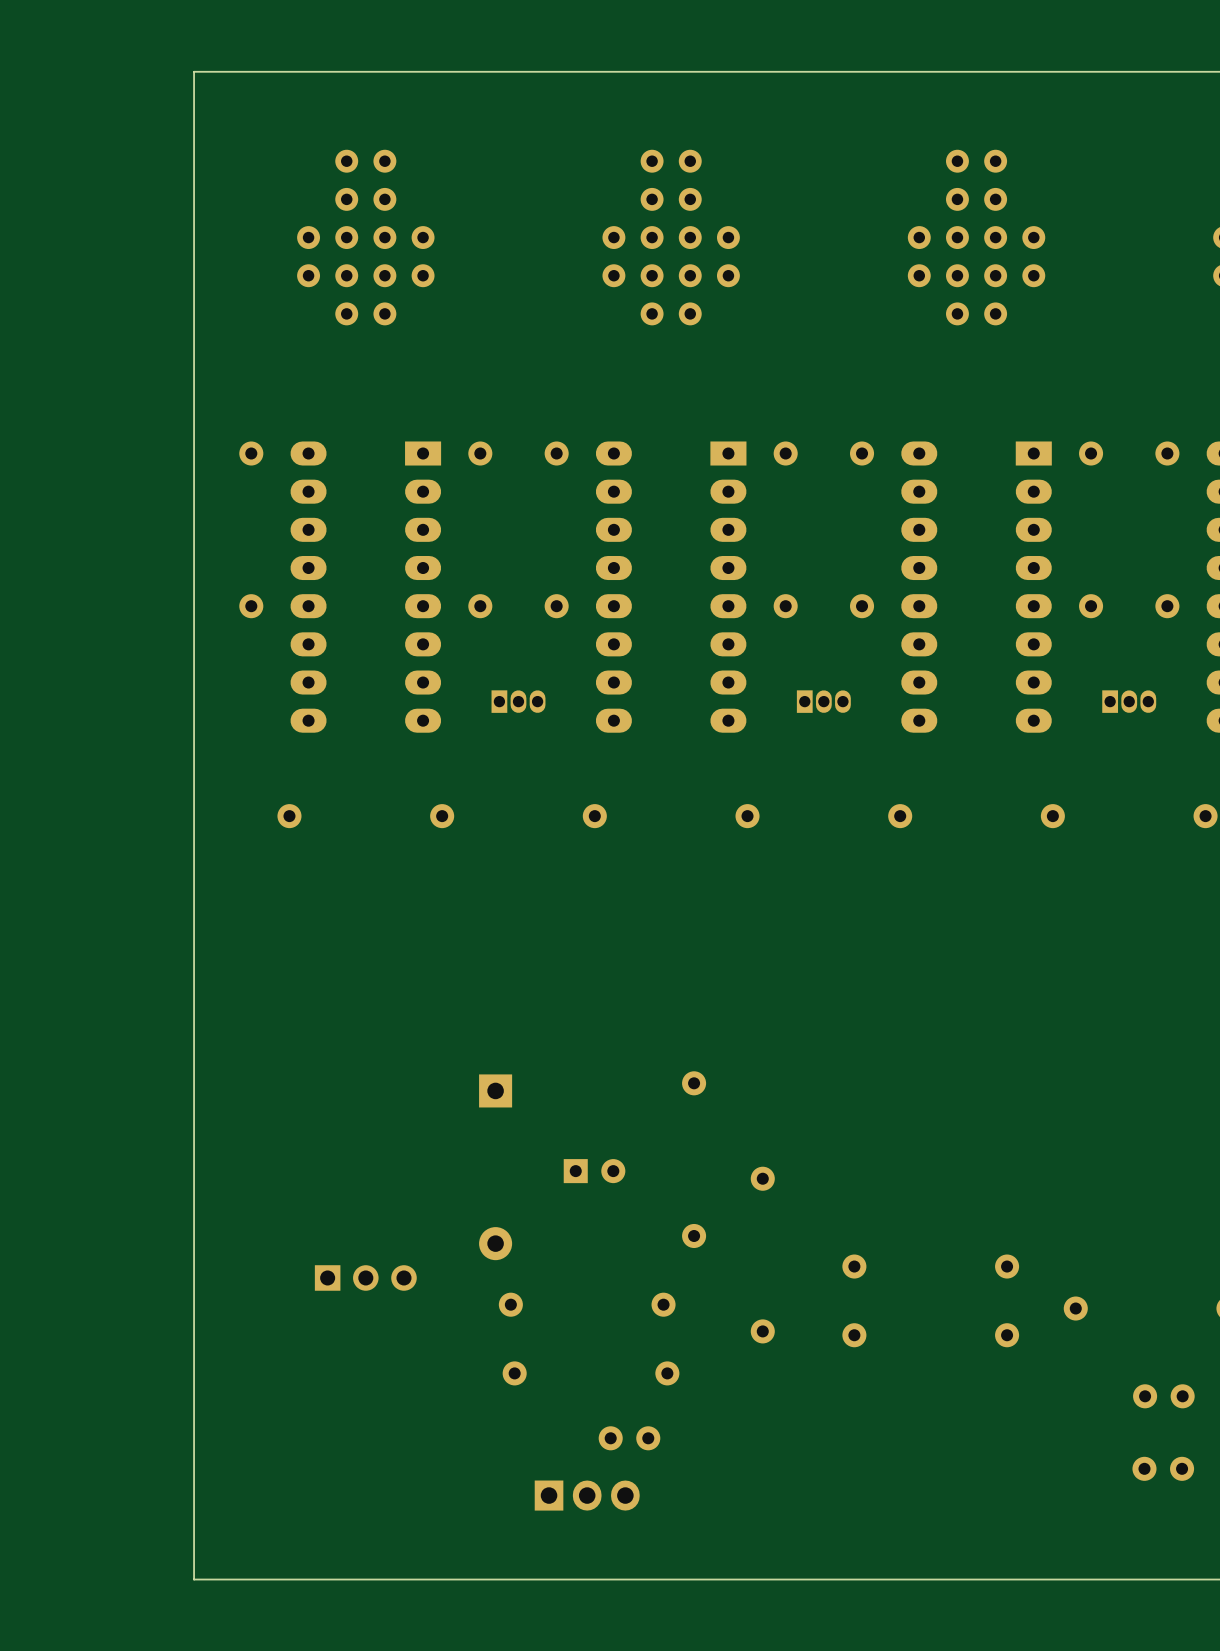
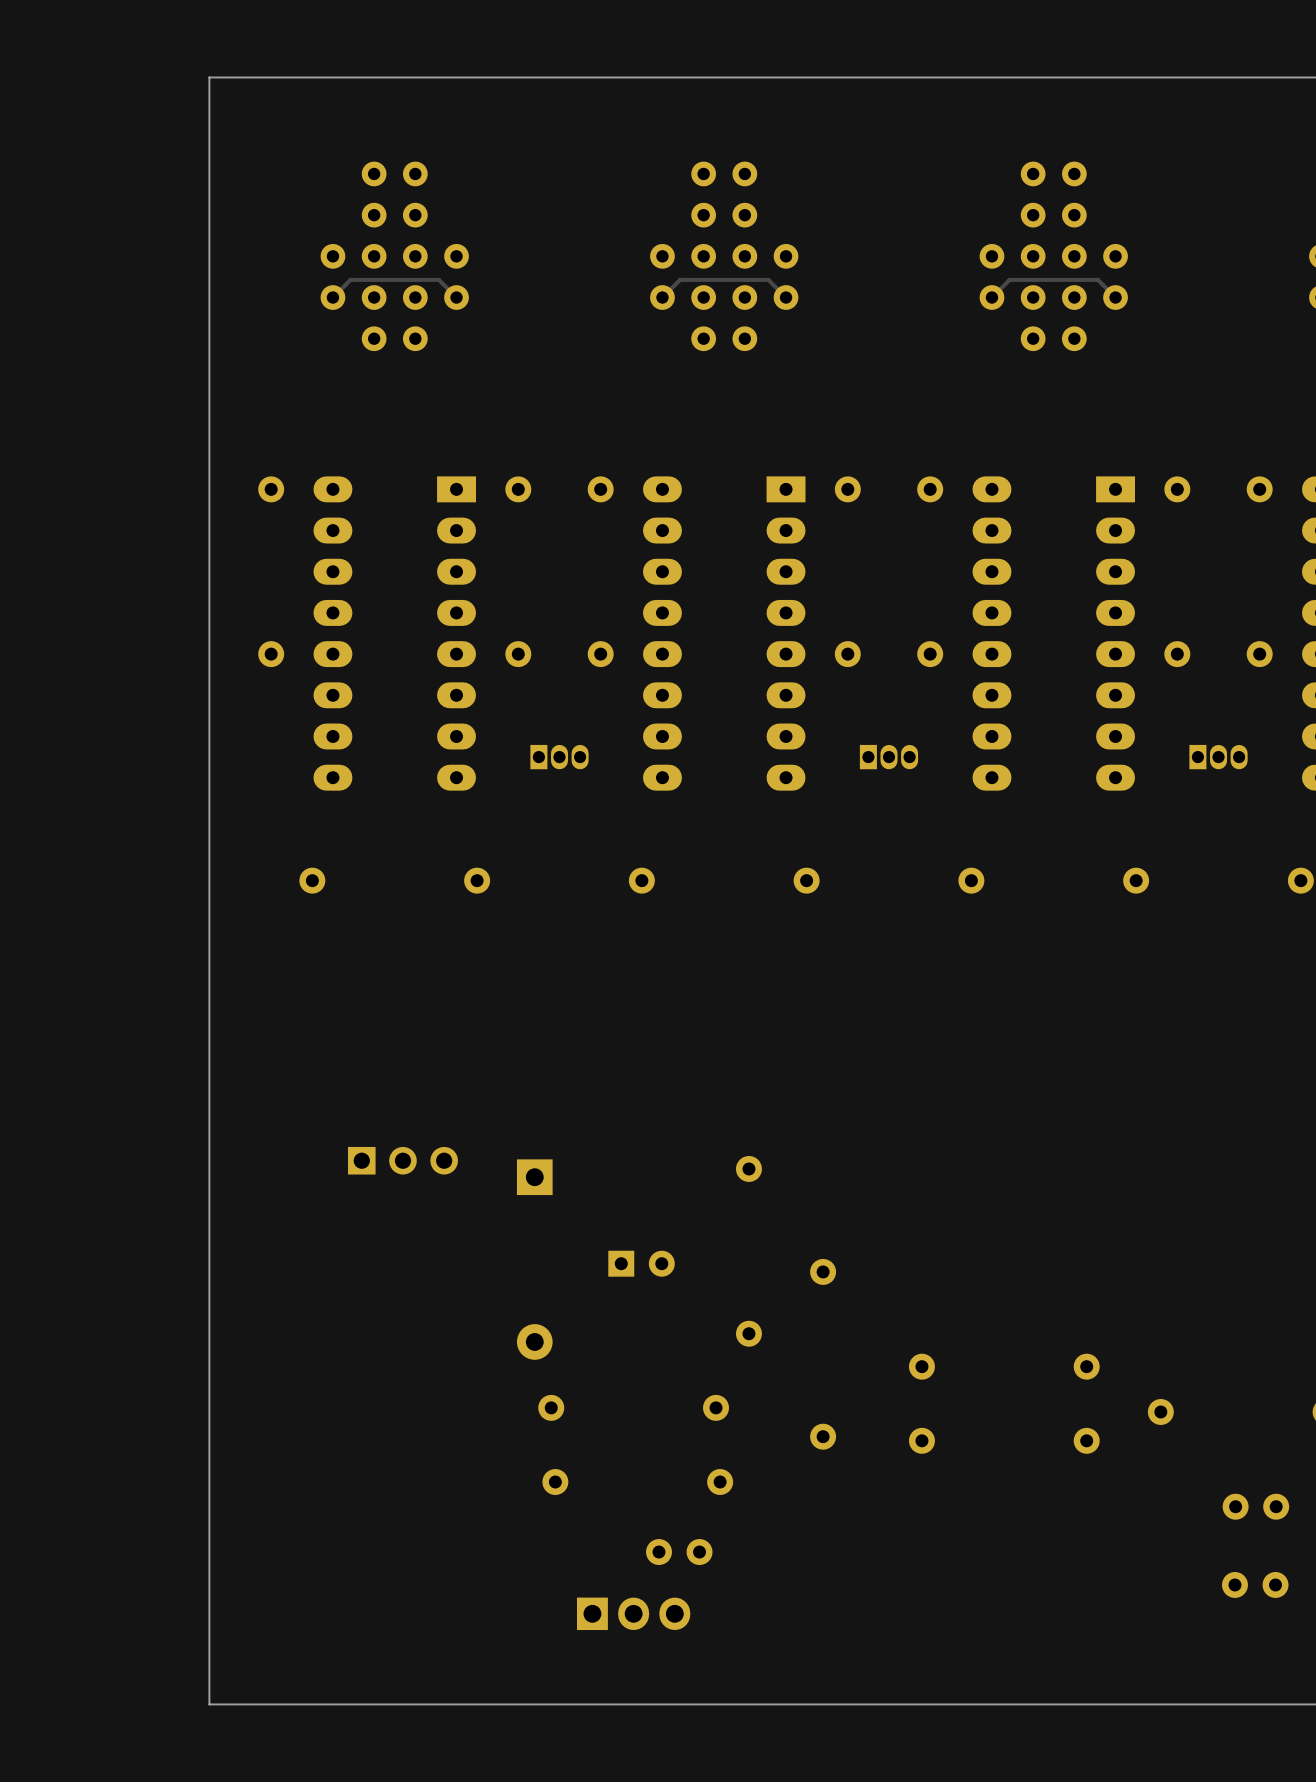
track: none -> (456, 297) (438, 279) (350, 279) (332, 297)
track: none -> (786, 297) (768, 279) (680, 279) (662, 297)
track: none -> (1115, 297) (1097, 279) (1009, 279) (991, 297)
part position: (365, 1277) -> (402, 1160)

